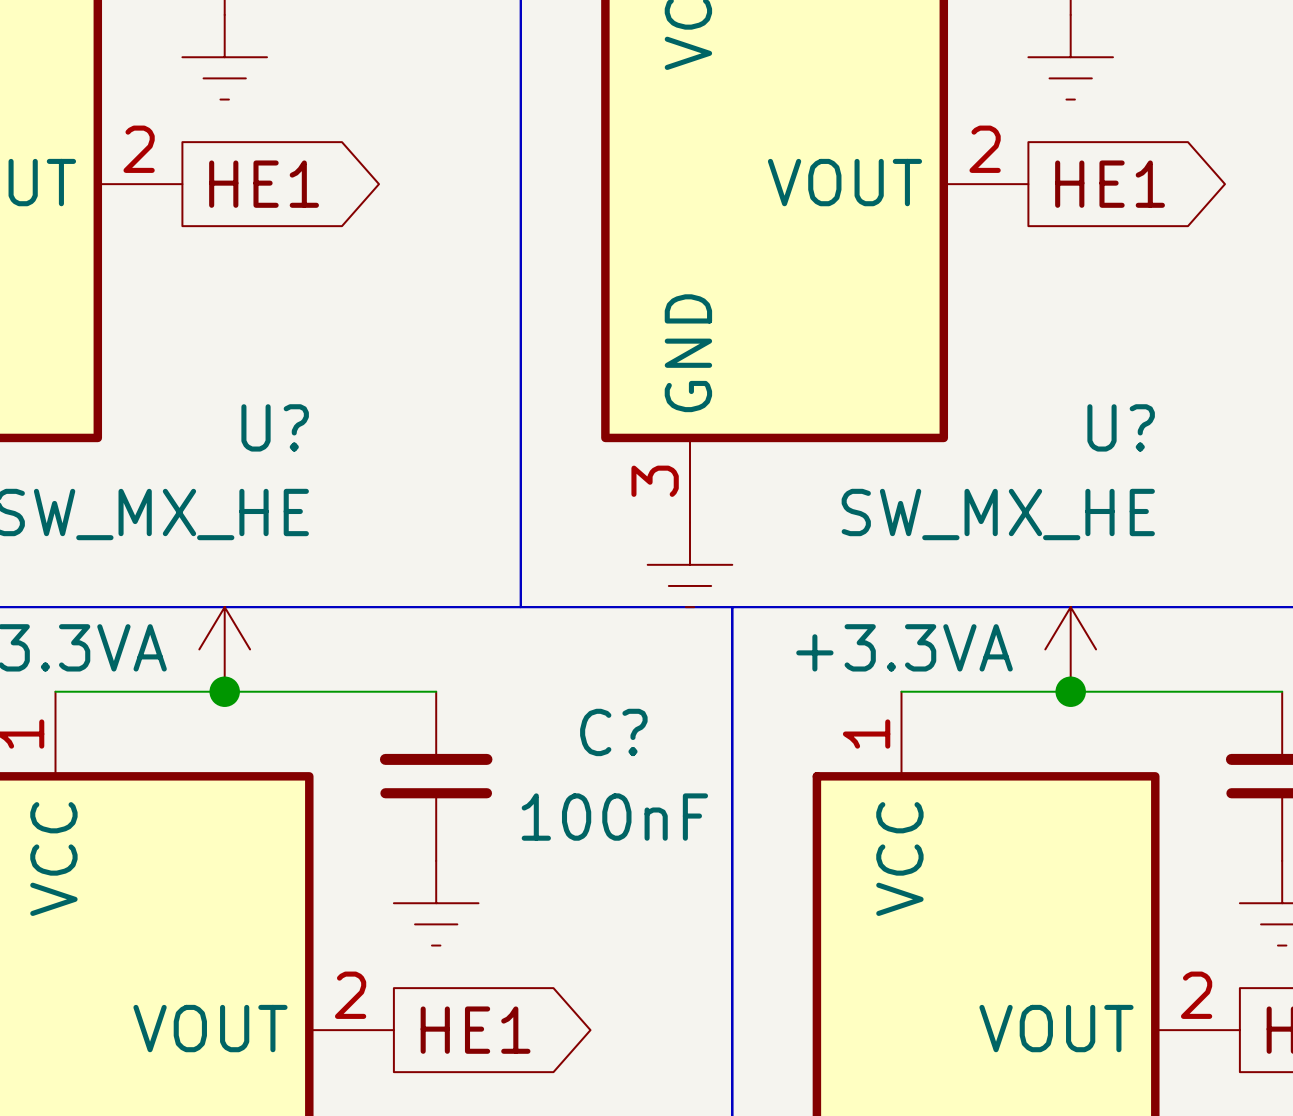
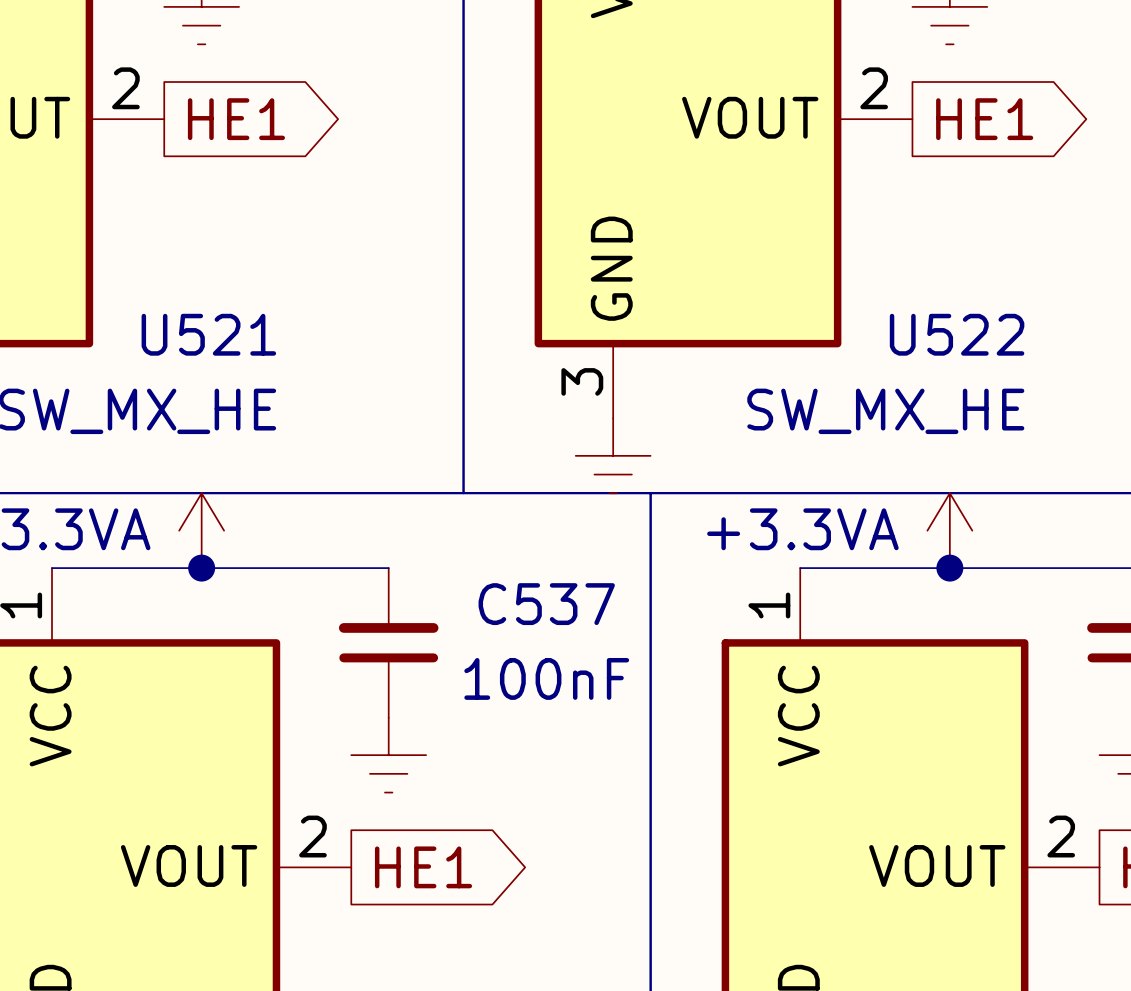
U? name: U? (275, 427) -> U521 (208, 334)
U? name: U? (1121, 427) -> U522 (957, 334)
C? name: C? (613, 732) -> C537 (546, 604)

